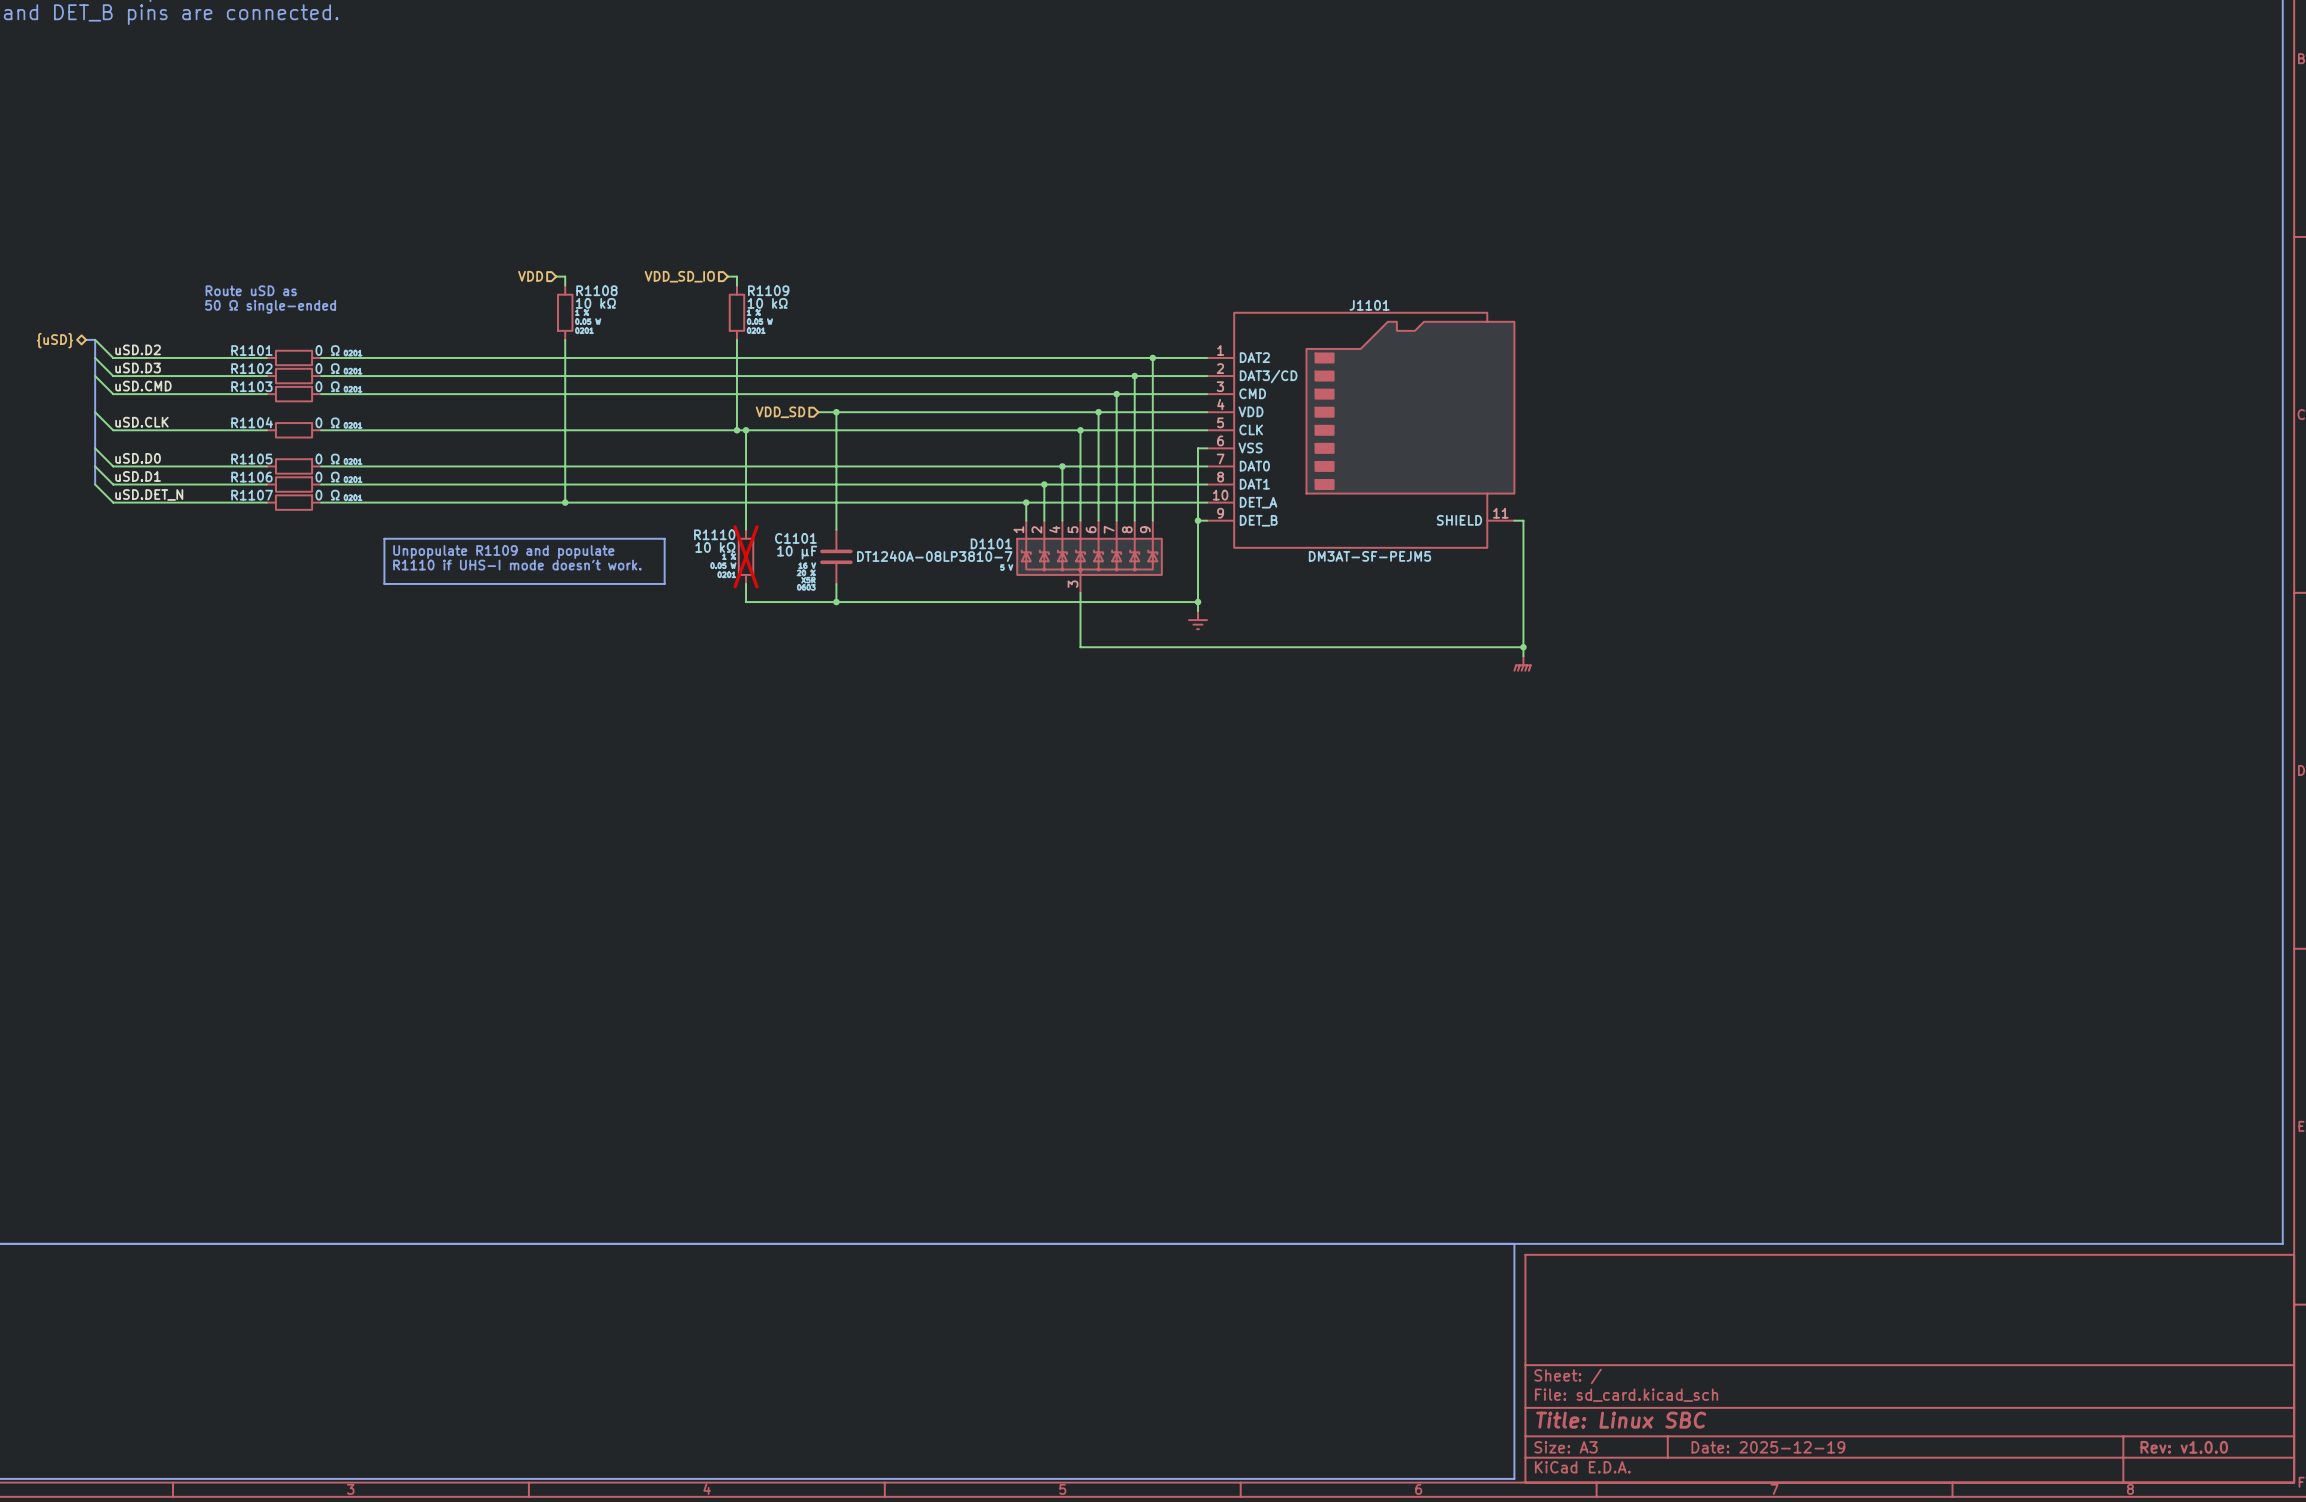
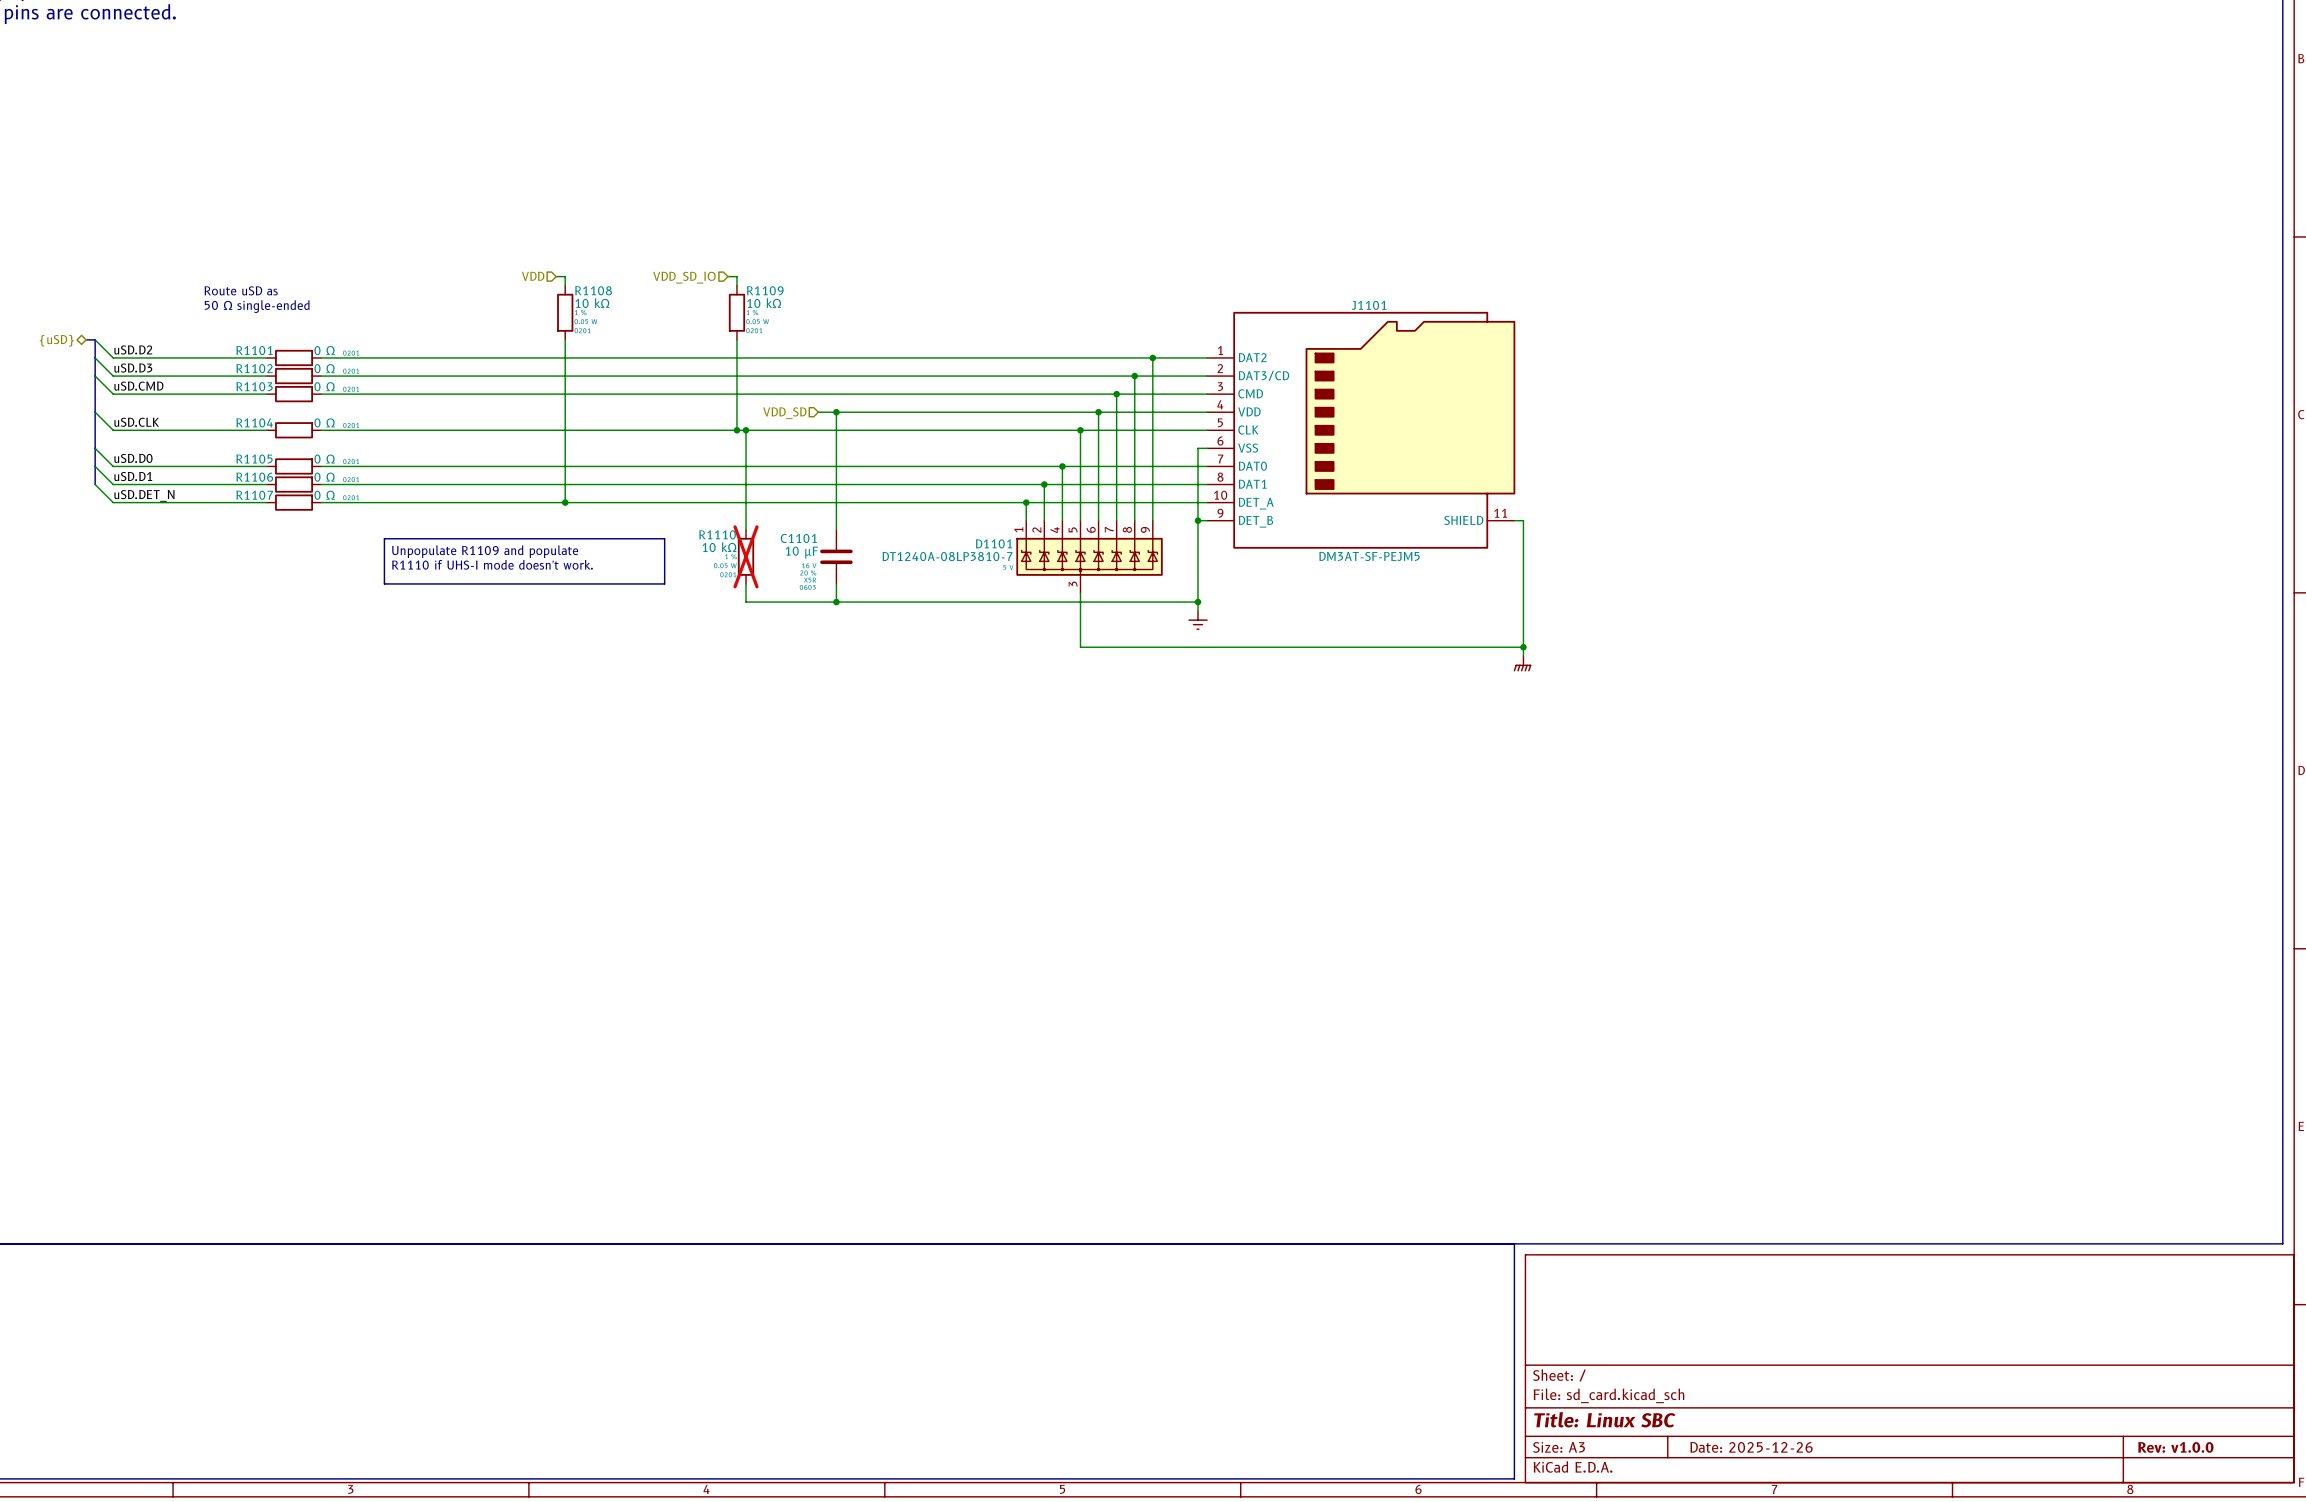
title block: Date: 2025-12-19 (1768, 1447) -> Date: 2025-12-26 (1751, 1447)

